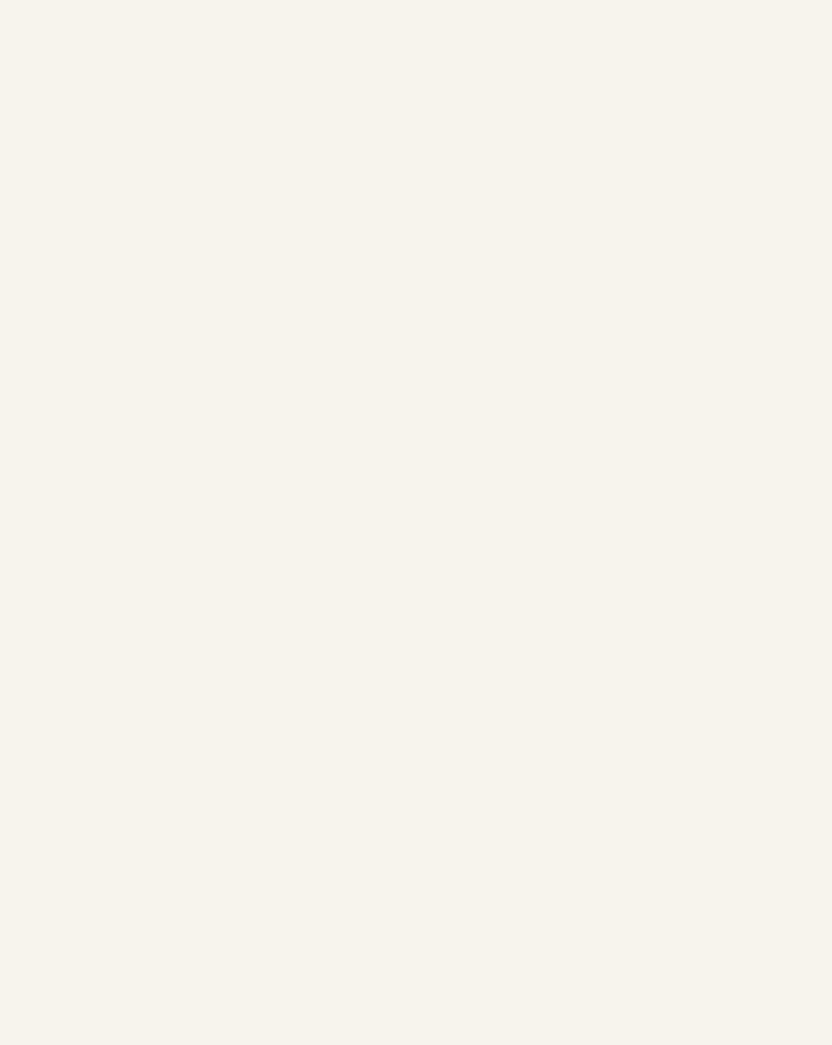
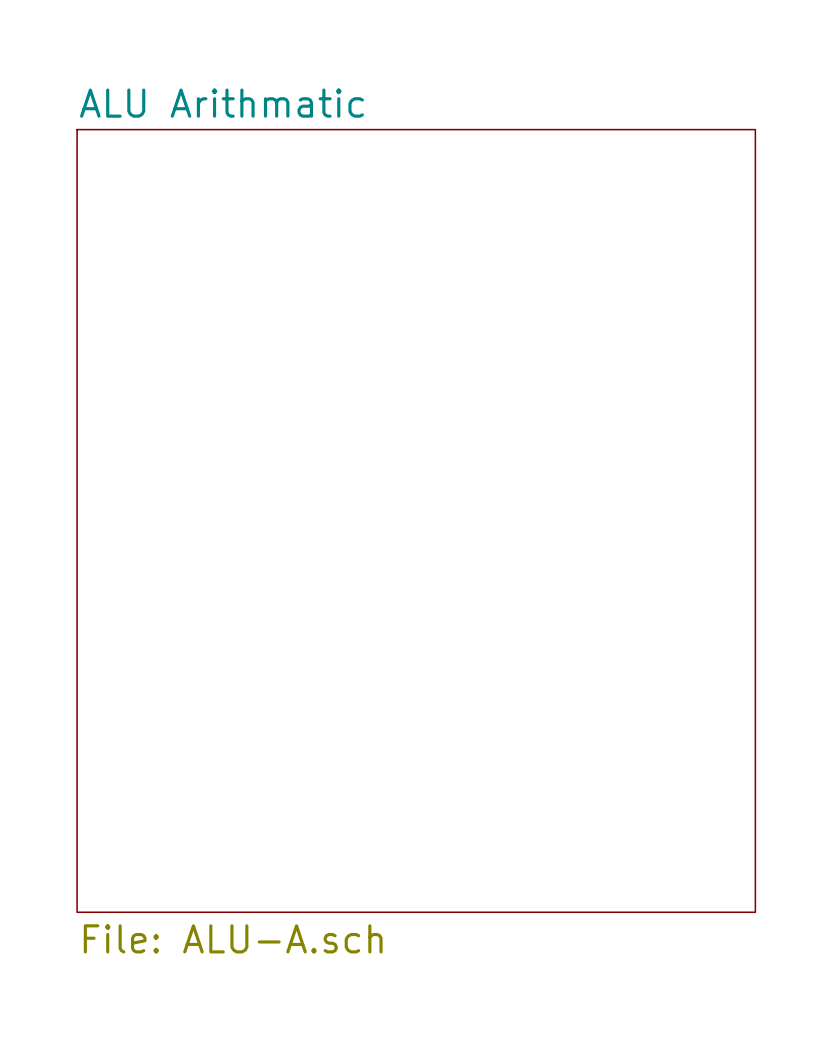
sheet ALU Arithmatic: none -> File: ALU-A.sch (416, 520)

